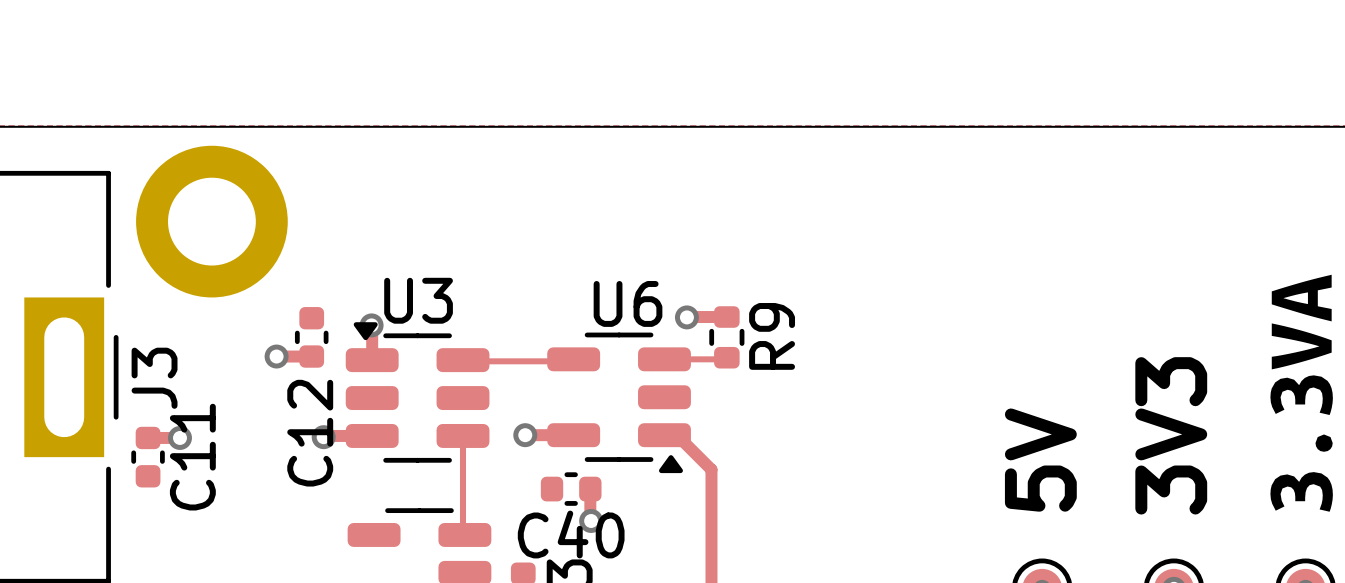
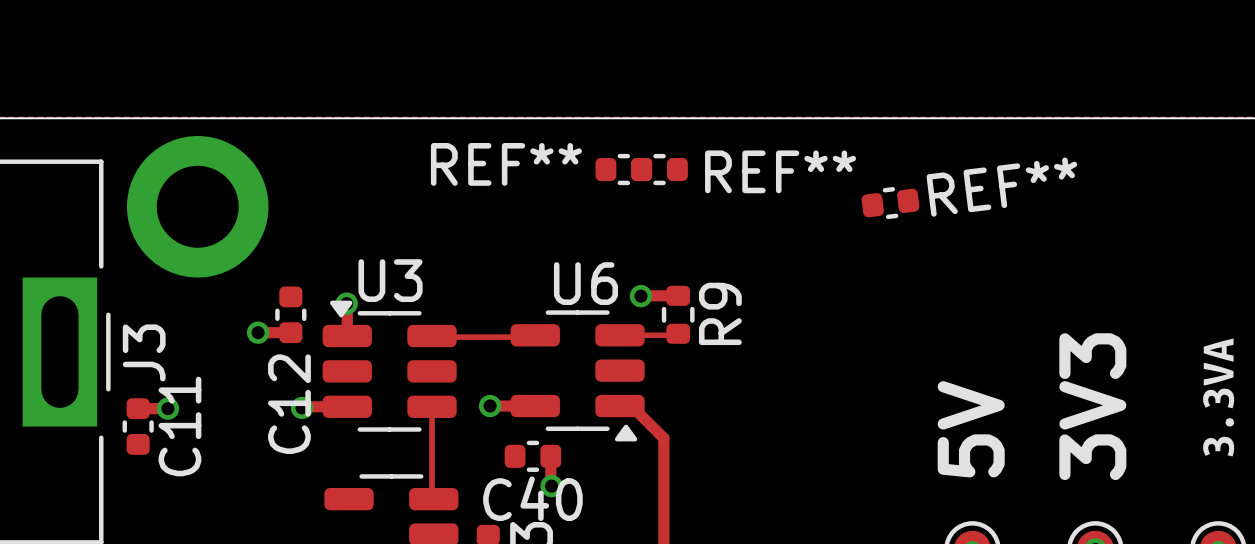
REF**: none -> (623, 169)
REF**: none -> (659, 169)
REF**: none -> (890, 203)
drawing shape: [1270, 274, 1333, 512] -> [1203, 338, 1235, 457]

